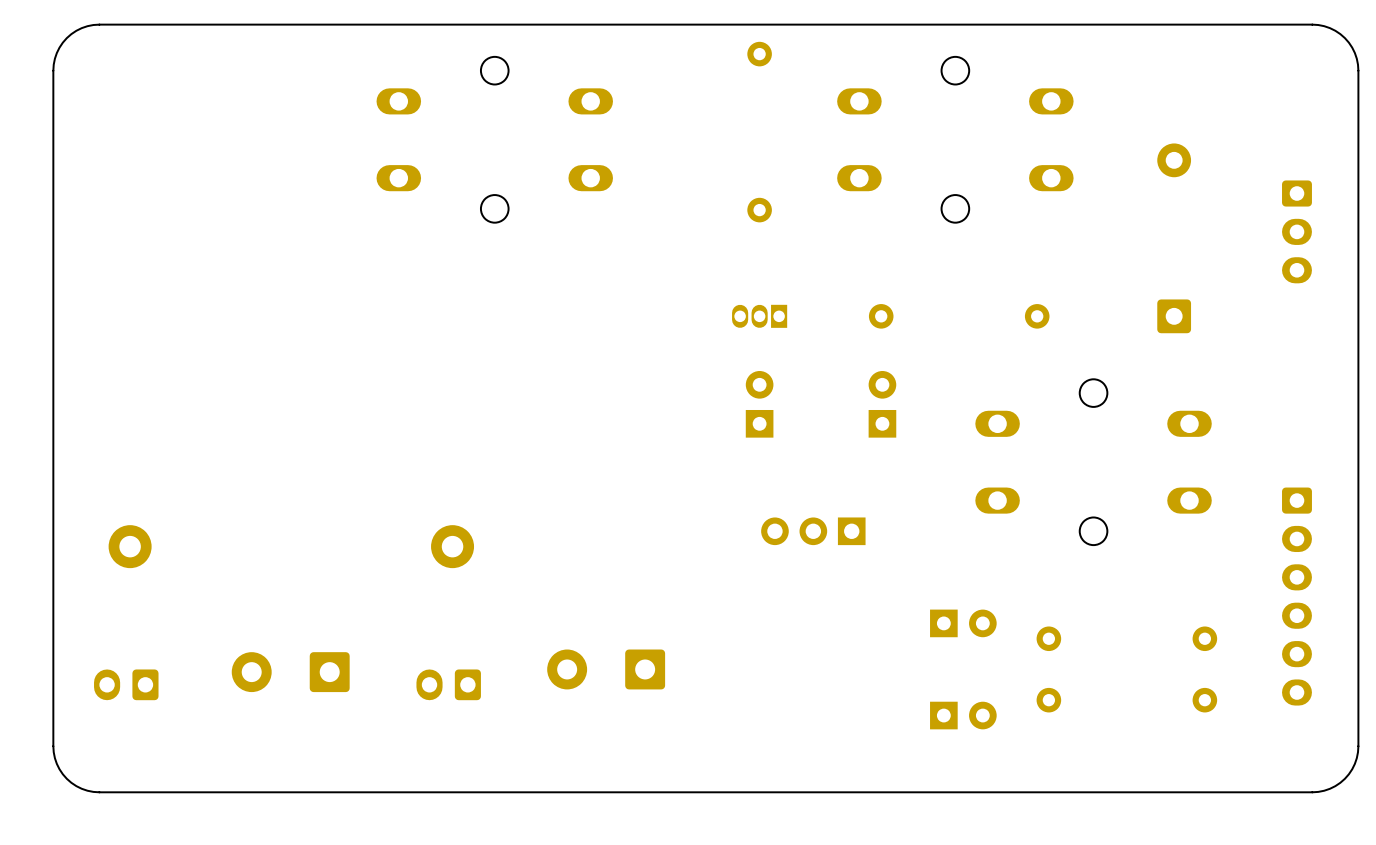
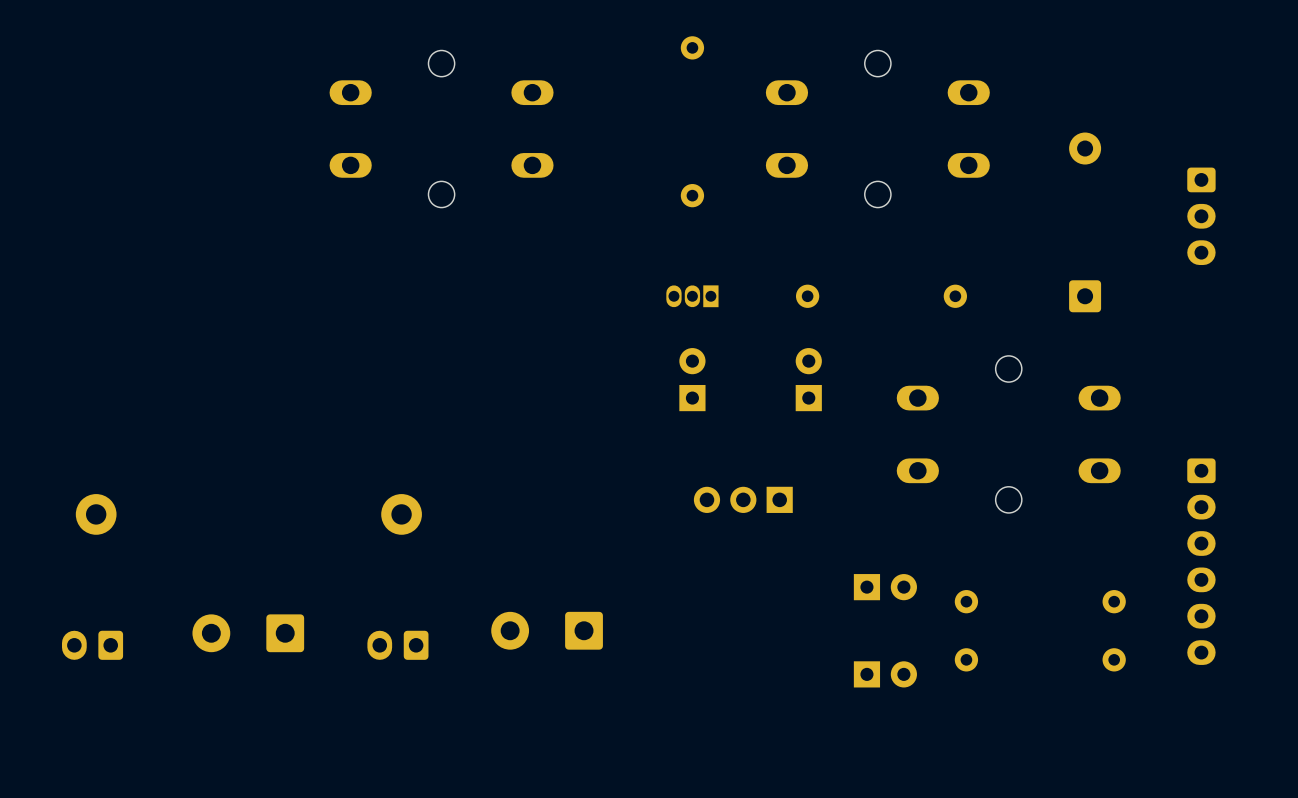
board edge: (1312, 24) (99, 24) (87, 26) (76, 30) (66, 38) (59, 47) (54, 58) (53, 70) (53, 746) (54, 758) (59, 769) (66, 778) (76, 786) (87, 790) (99, 792) (1312, 792) (1324, 790) (1335, 786) (1344, 778) (1352, 769) (1356, 758) (1358, 746) (1358, 70) (1354, 53) (1344, 38) (1329, 28) (1312, 24) -> none

